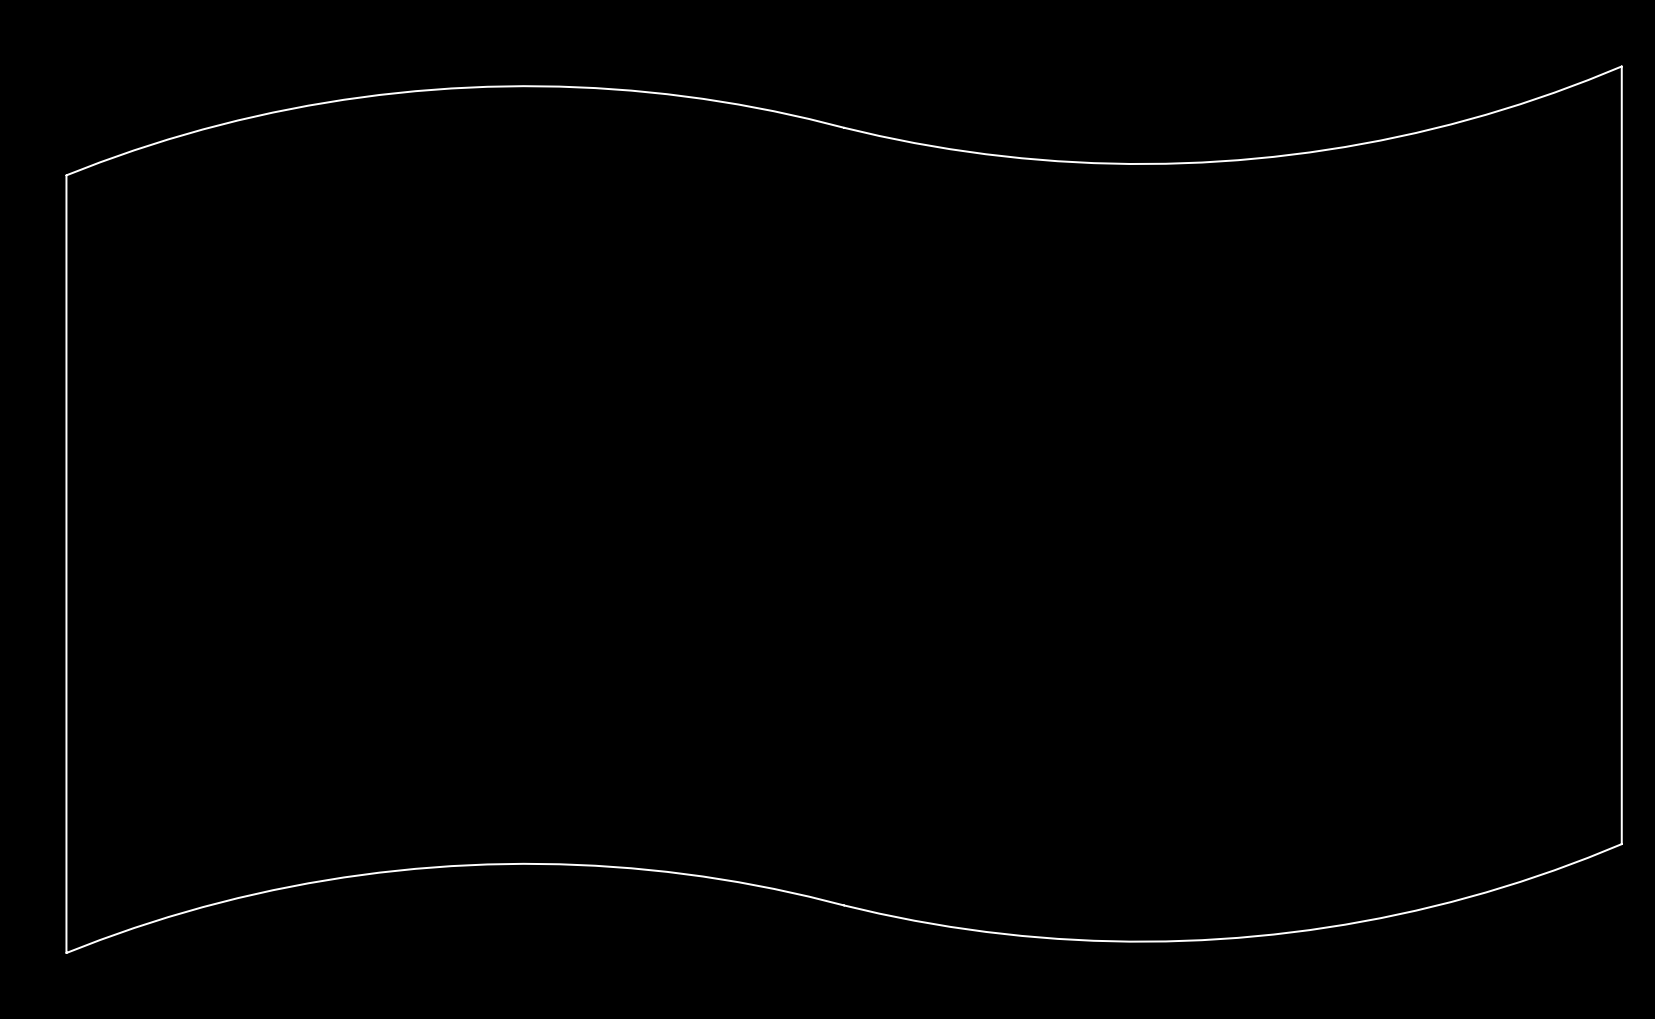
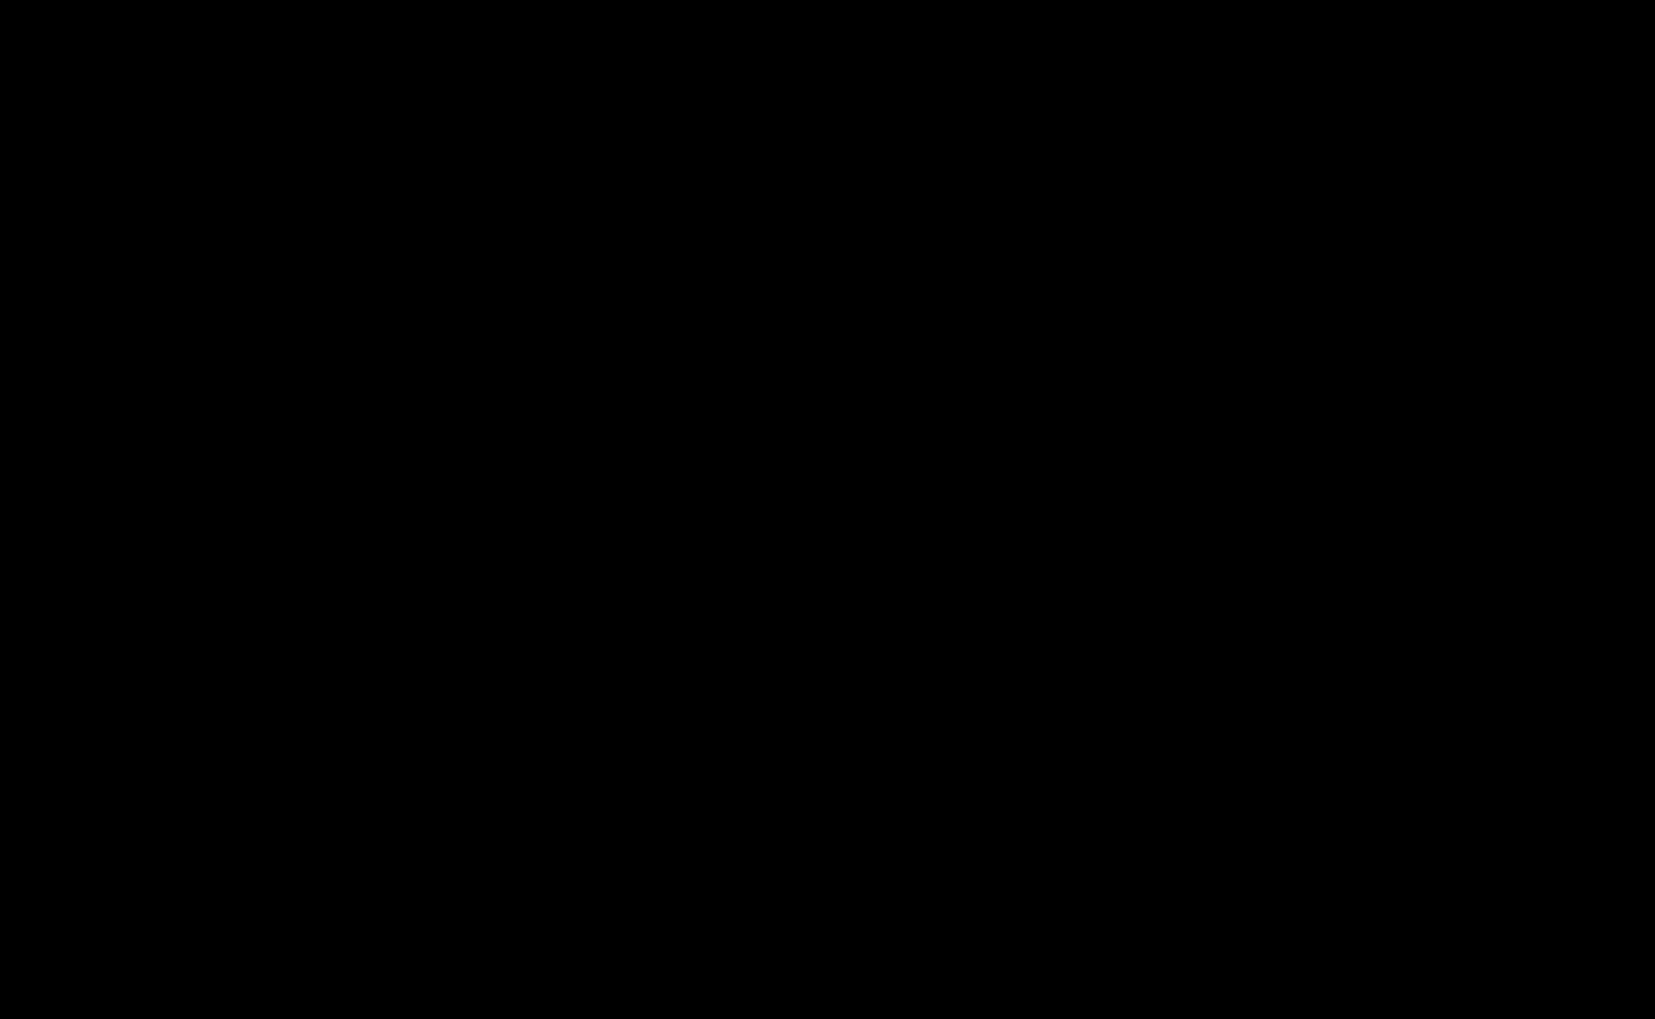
drawing: [65, 65, 1623, 954] -> none

